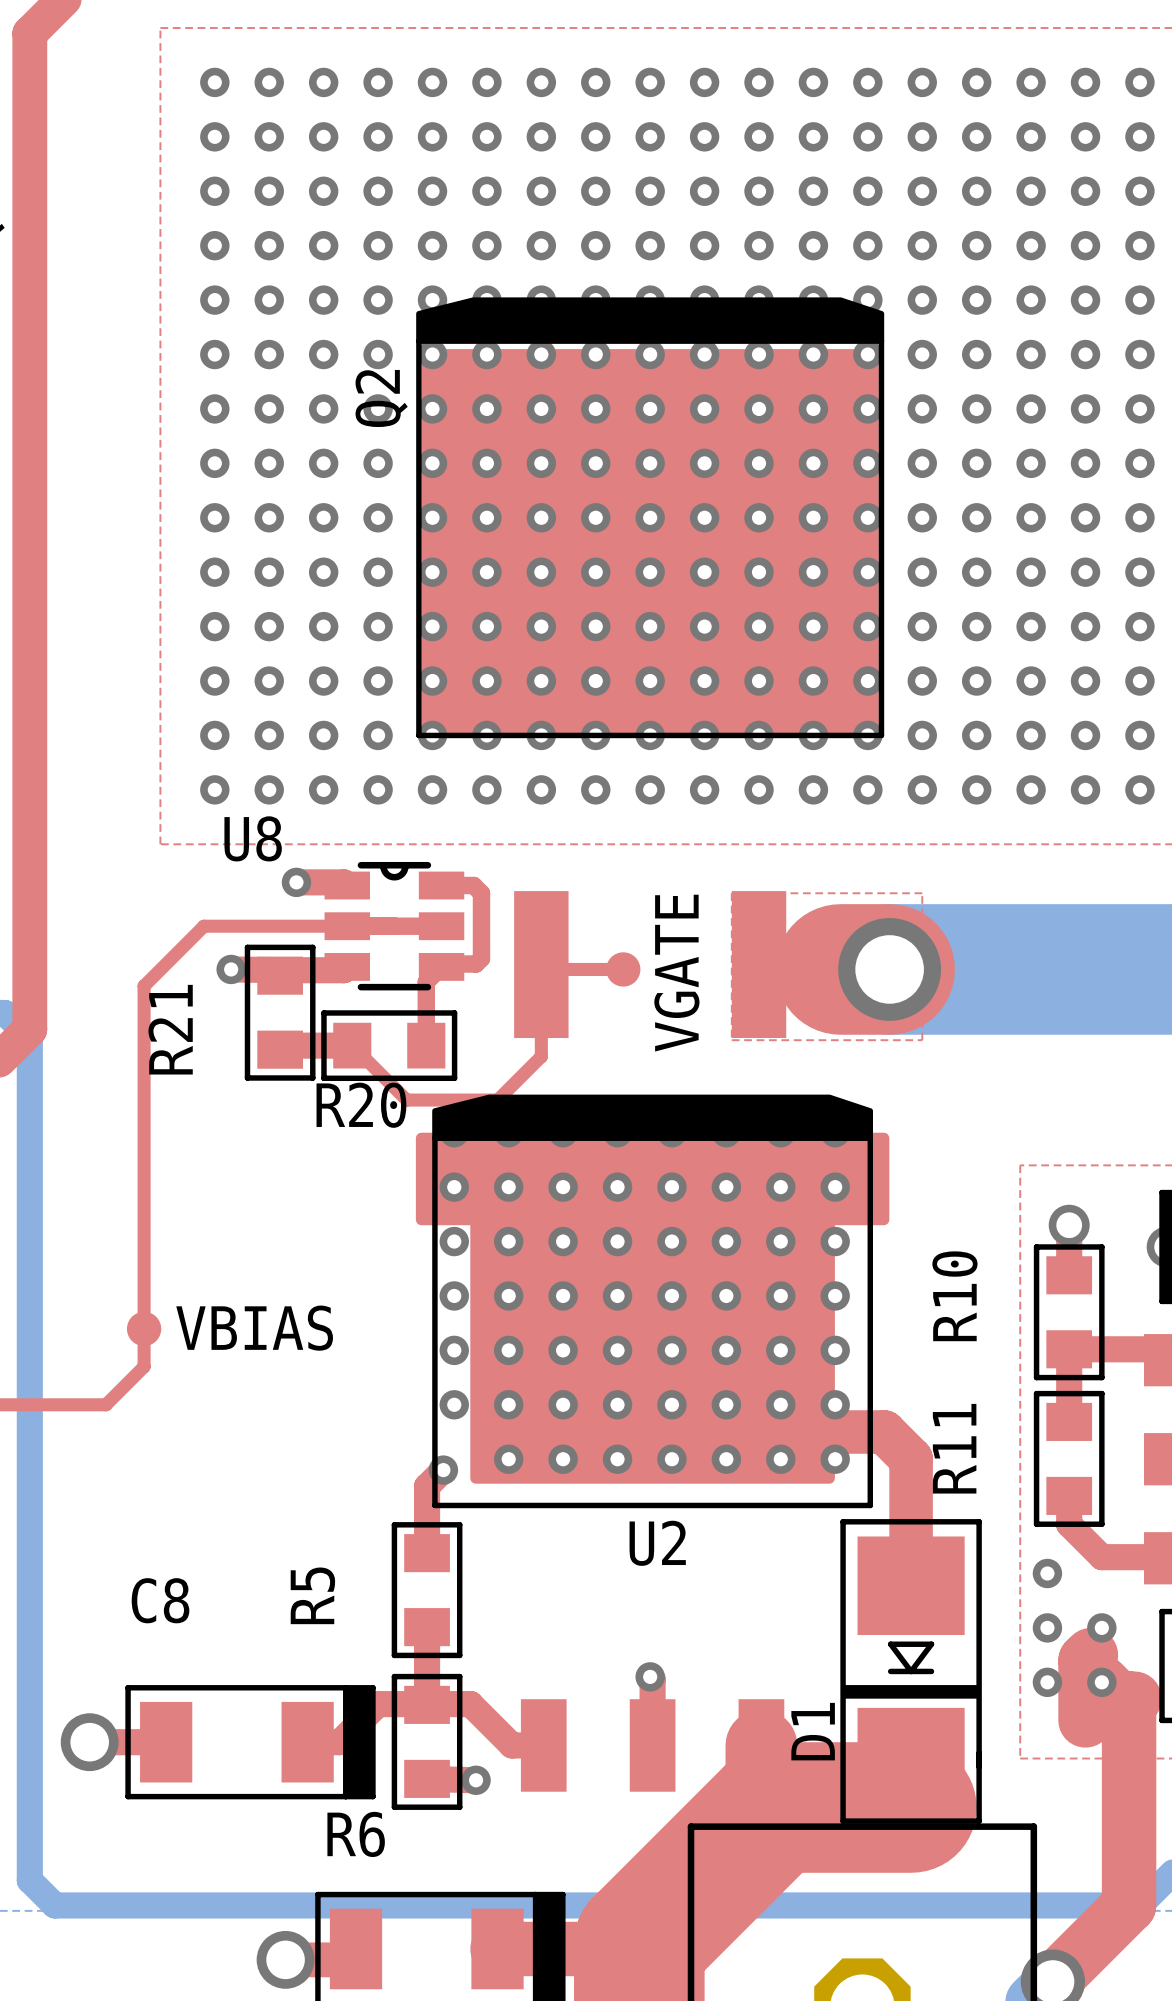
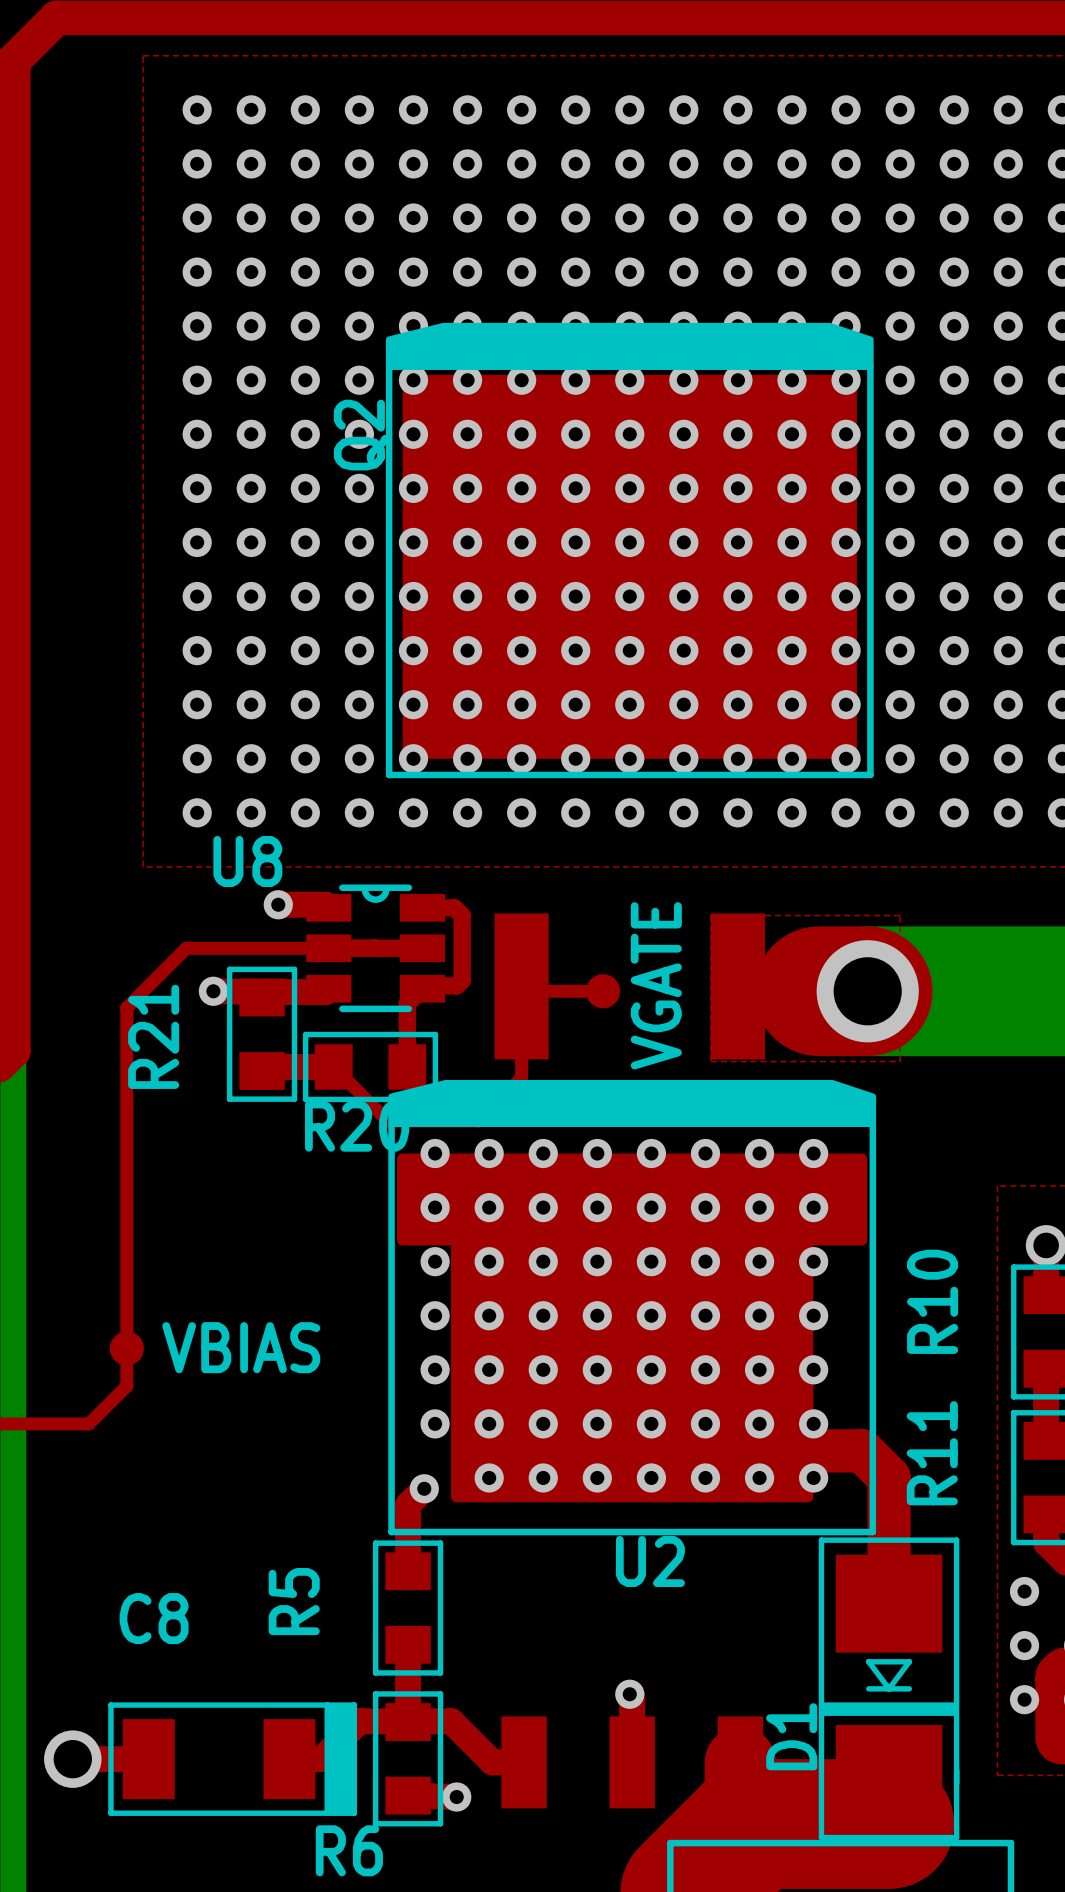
Q2 footprint: [416, 297, 885, 1039] -> [385, 322, 874, 1060]
U2 footprint: [415, 1094, 890, 1792] -> [388, 1079, 877, 1809]

